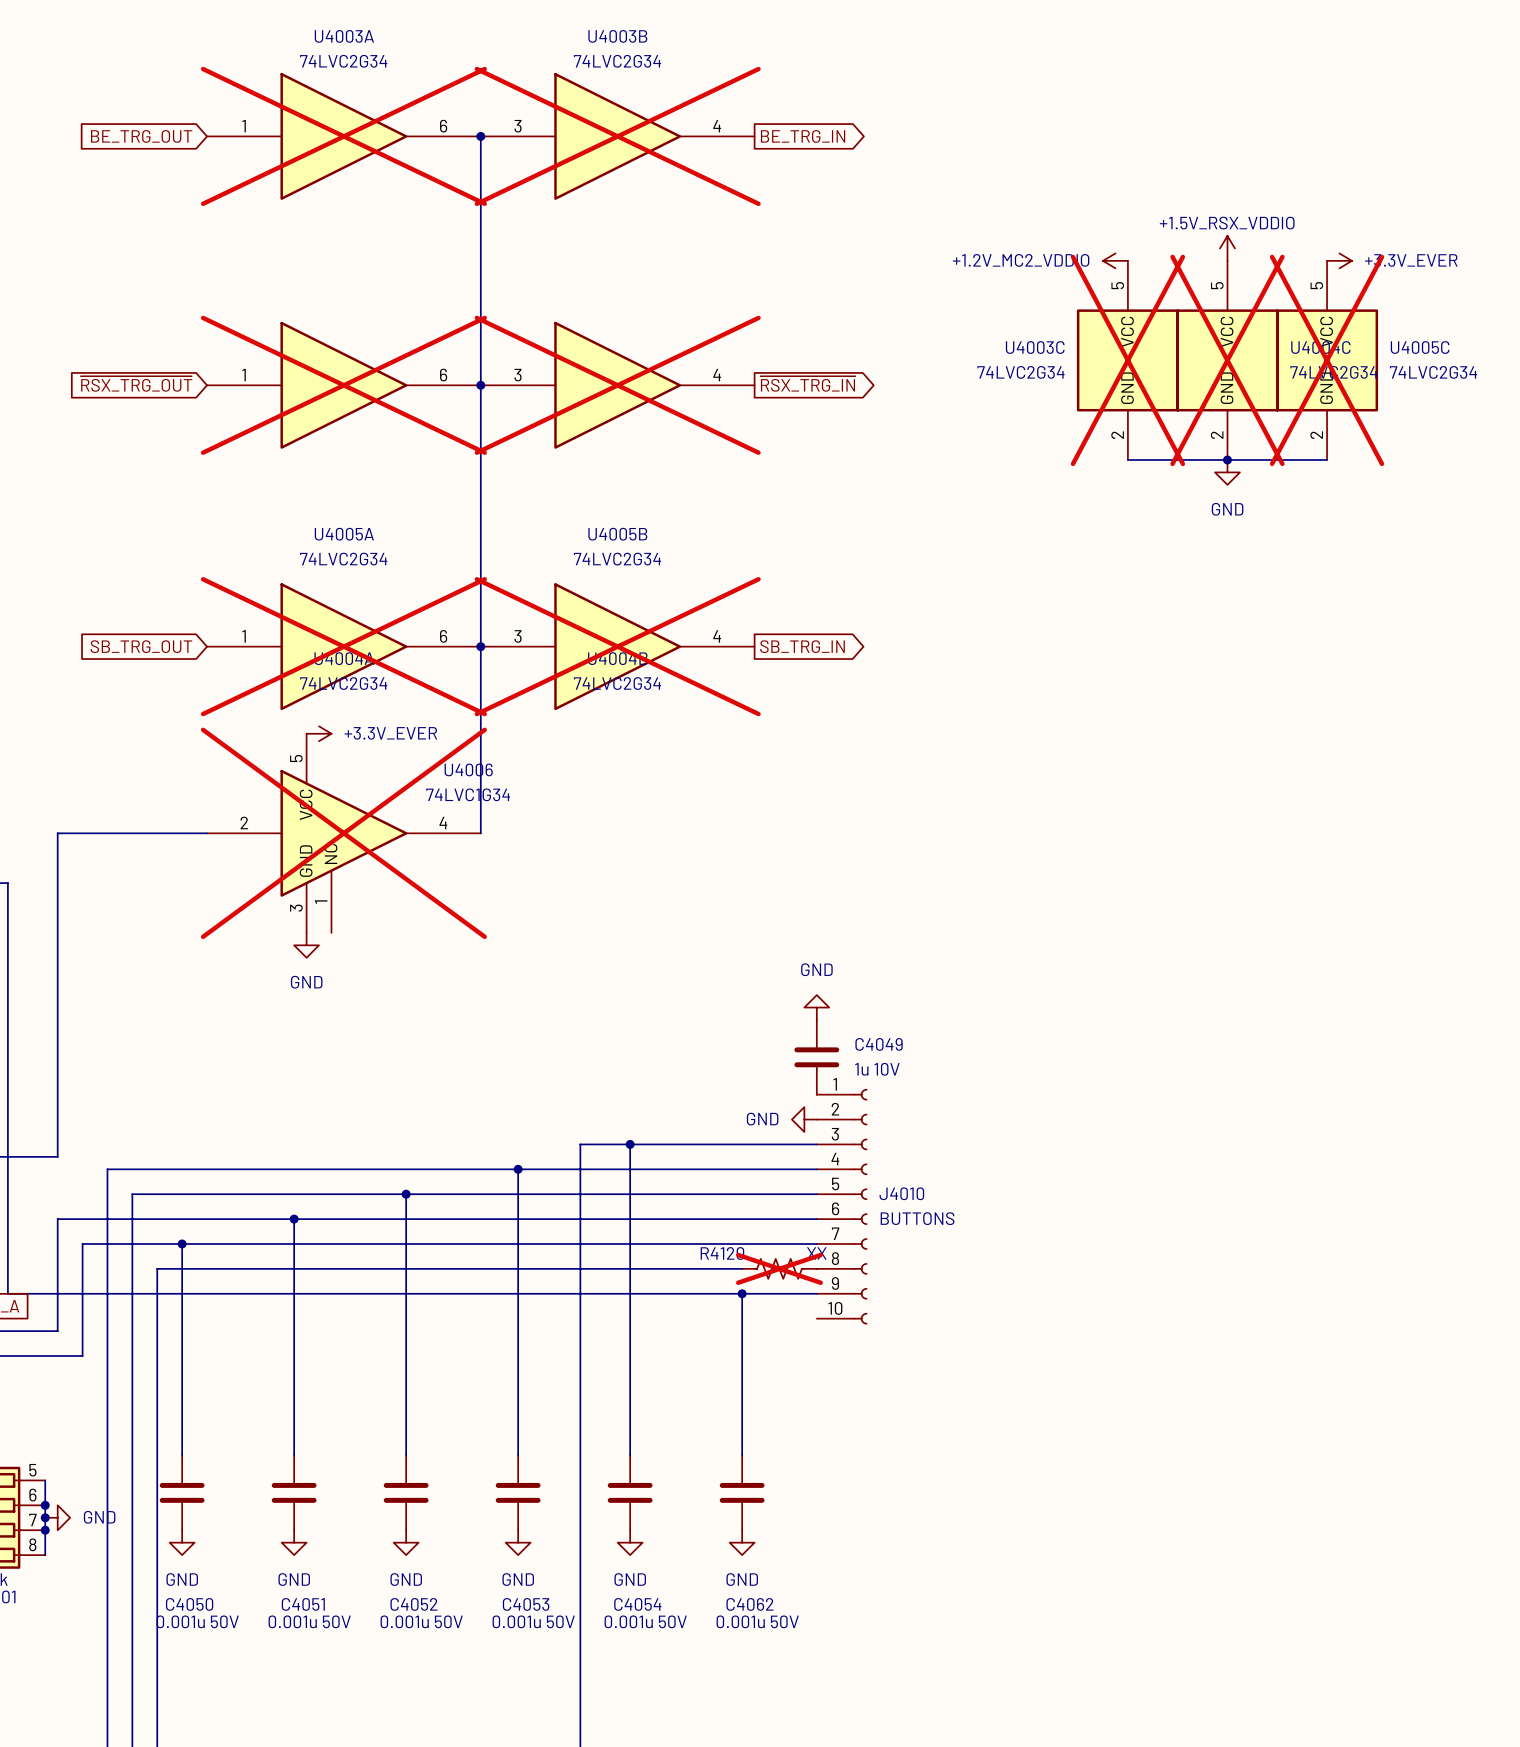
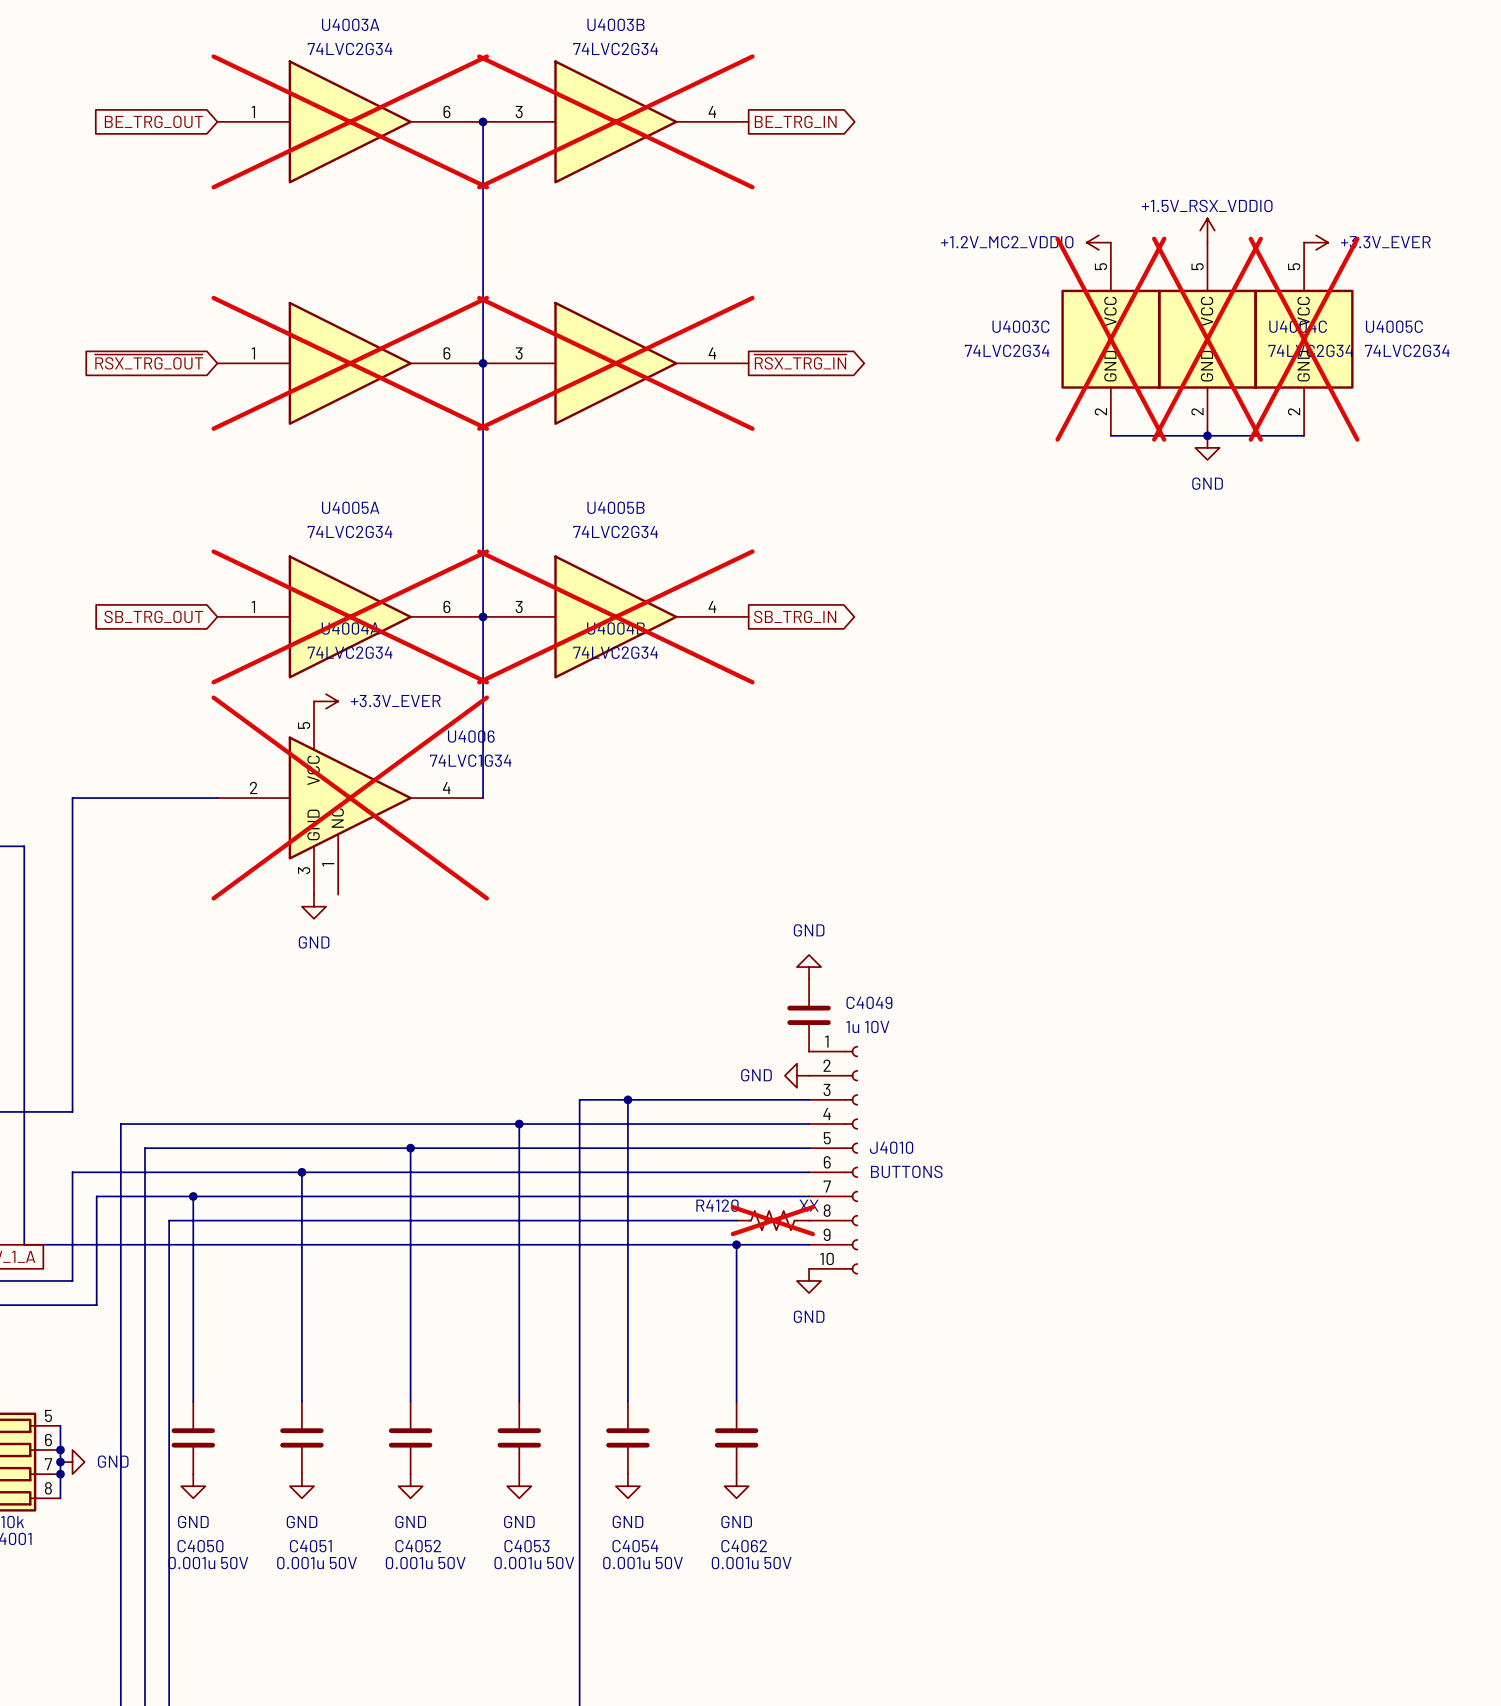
power symbol: none -> GND (809, 1280)

